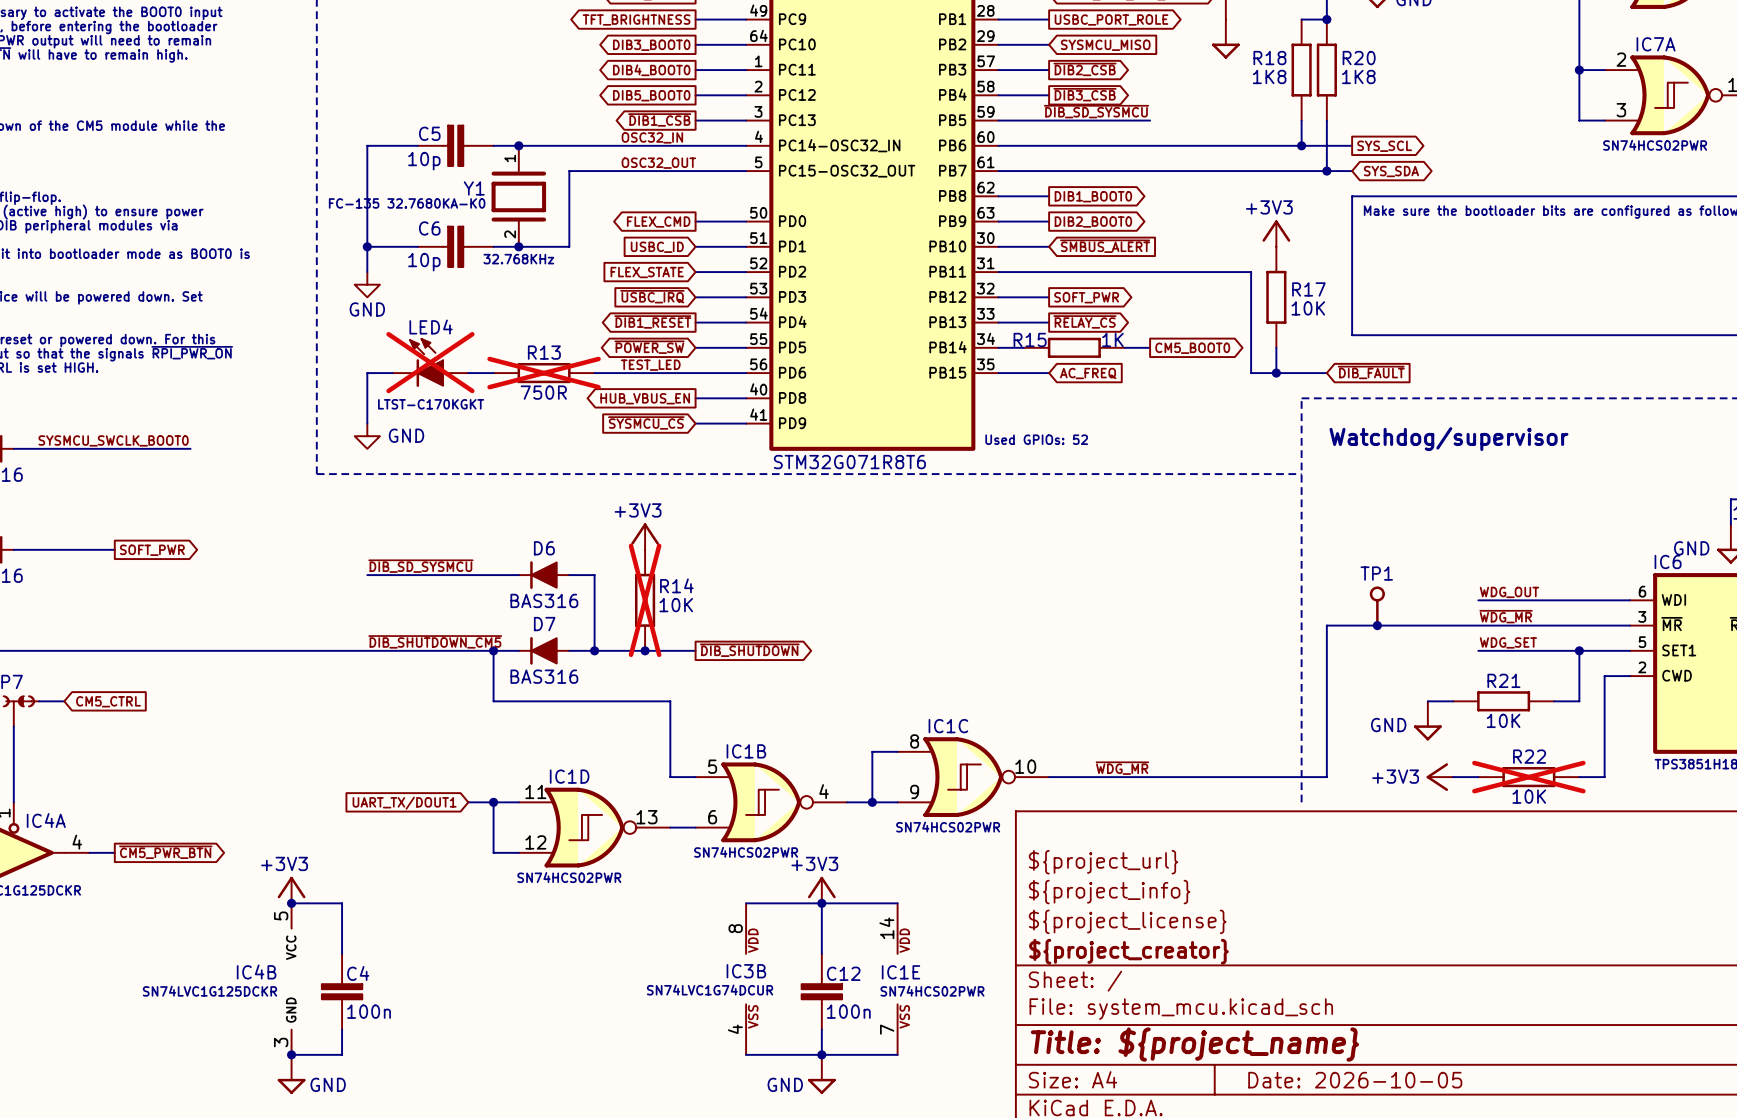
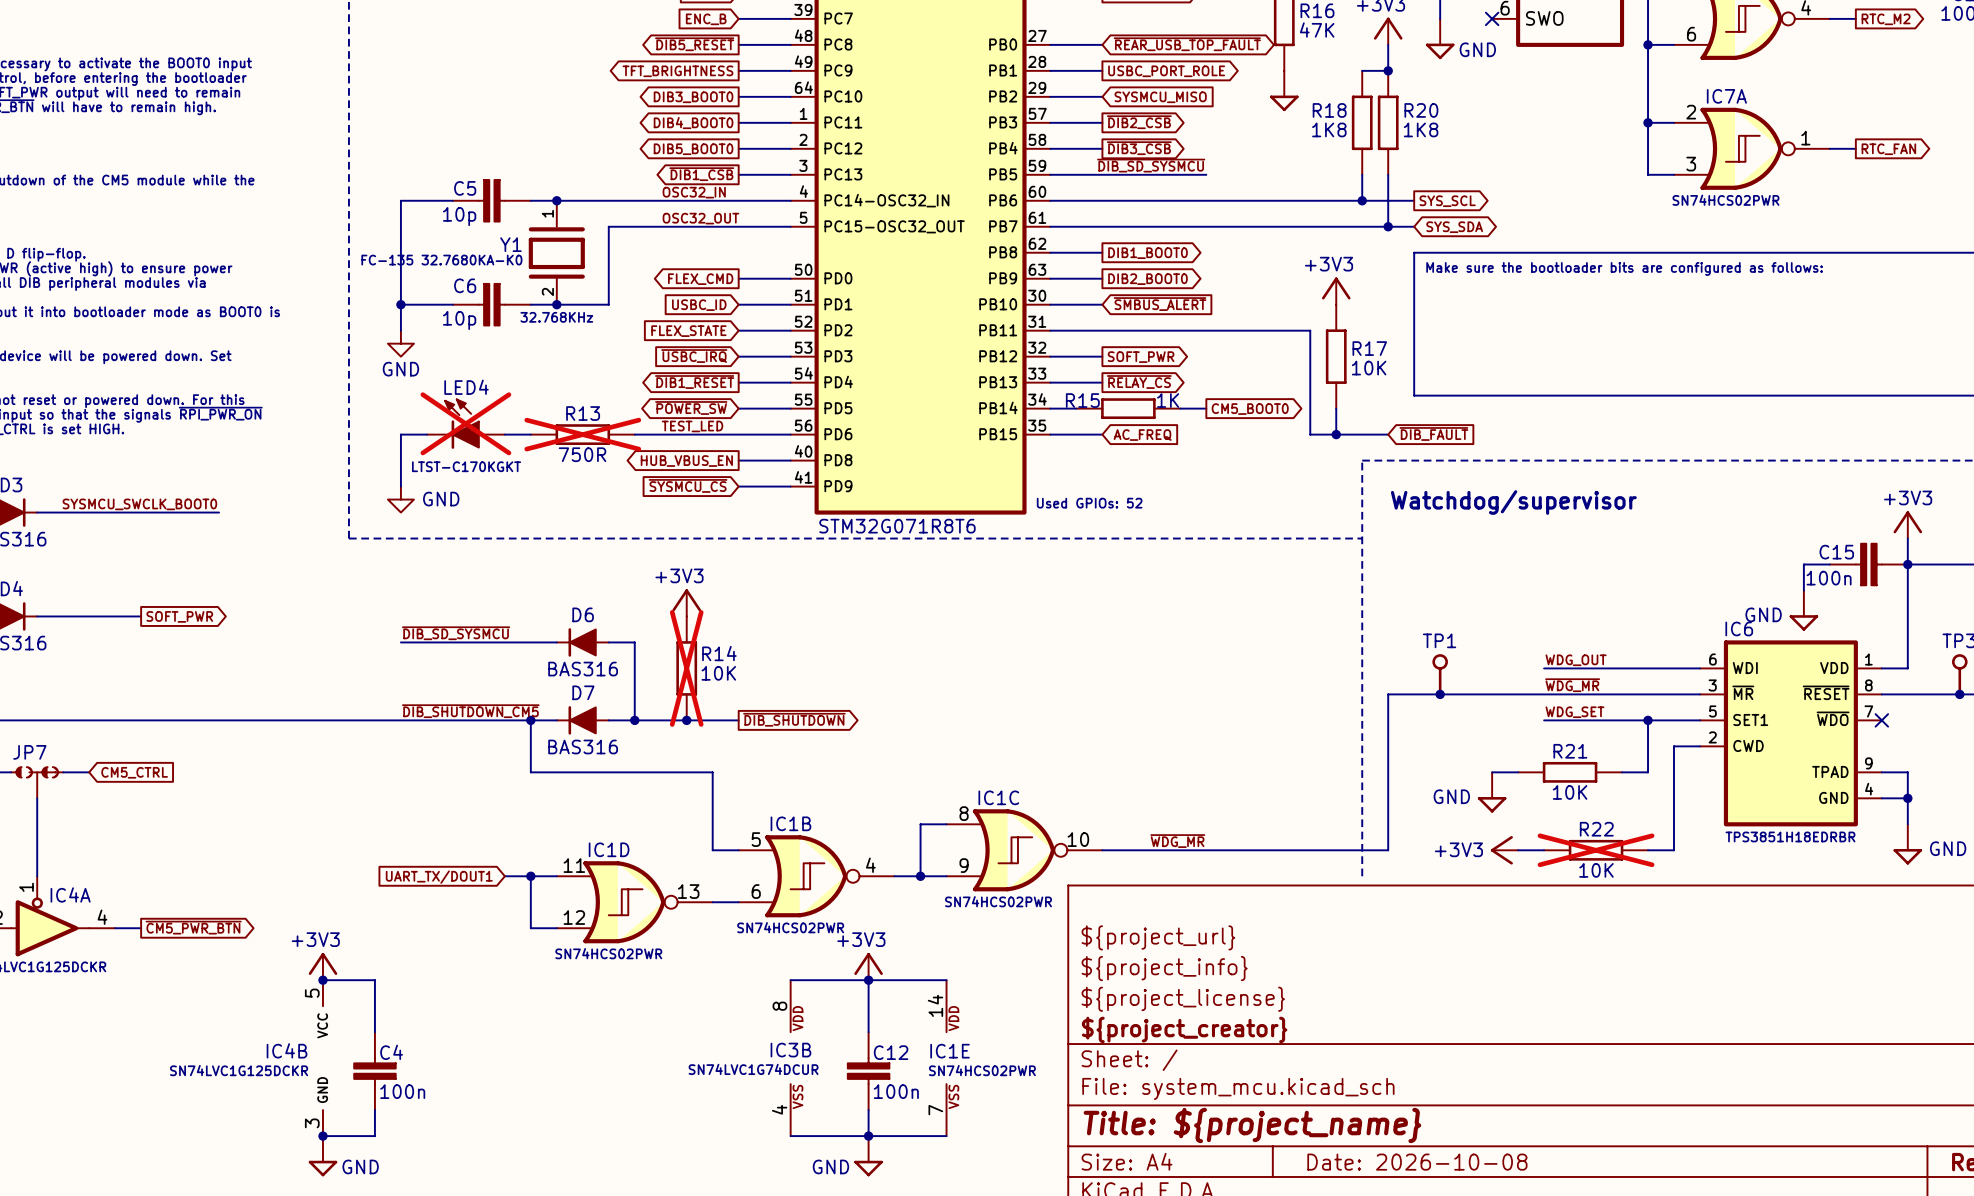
title block: Date: 2026-10-05 (1355, 1080) -> Date: 2026-10-08 (1417, 1162)

